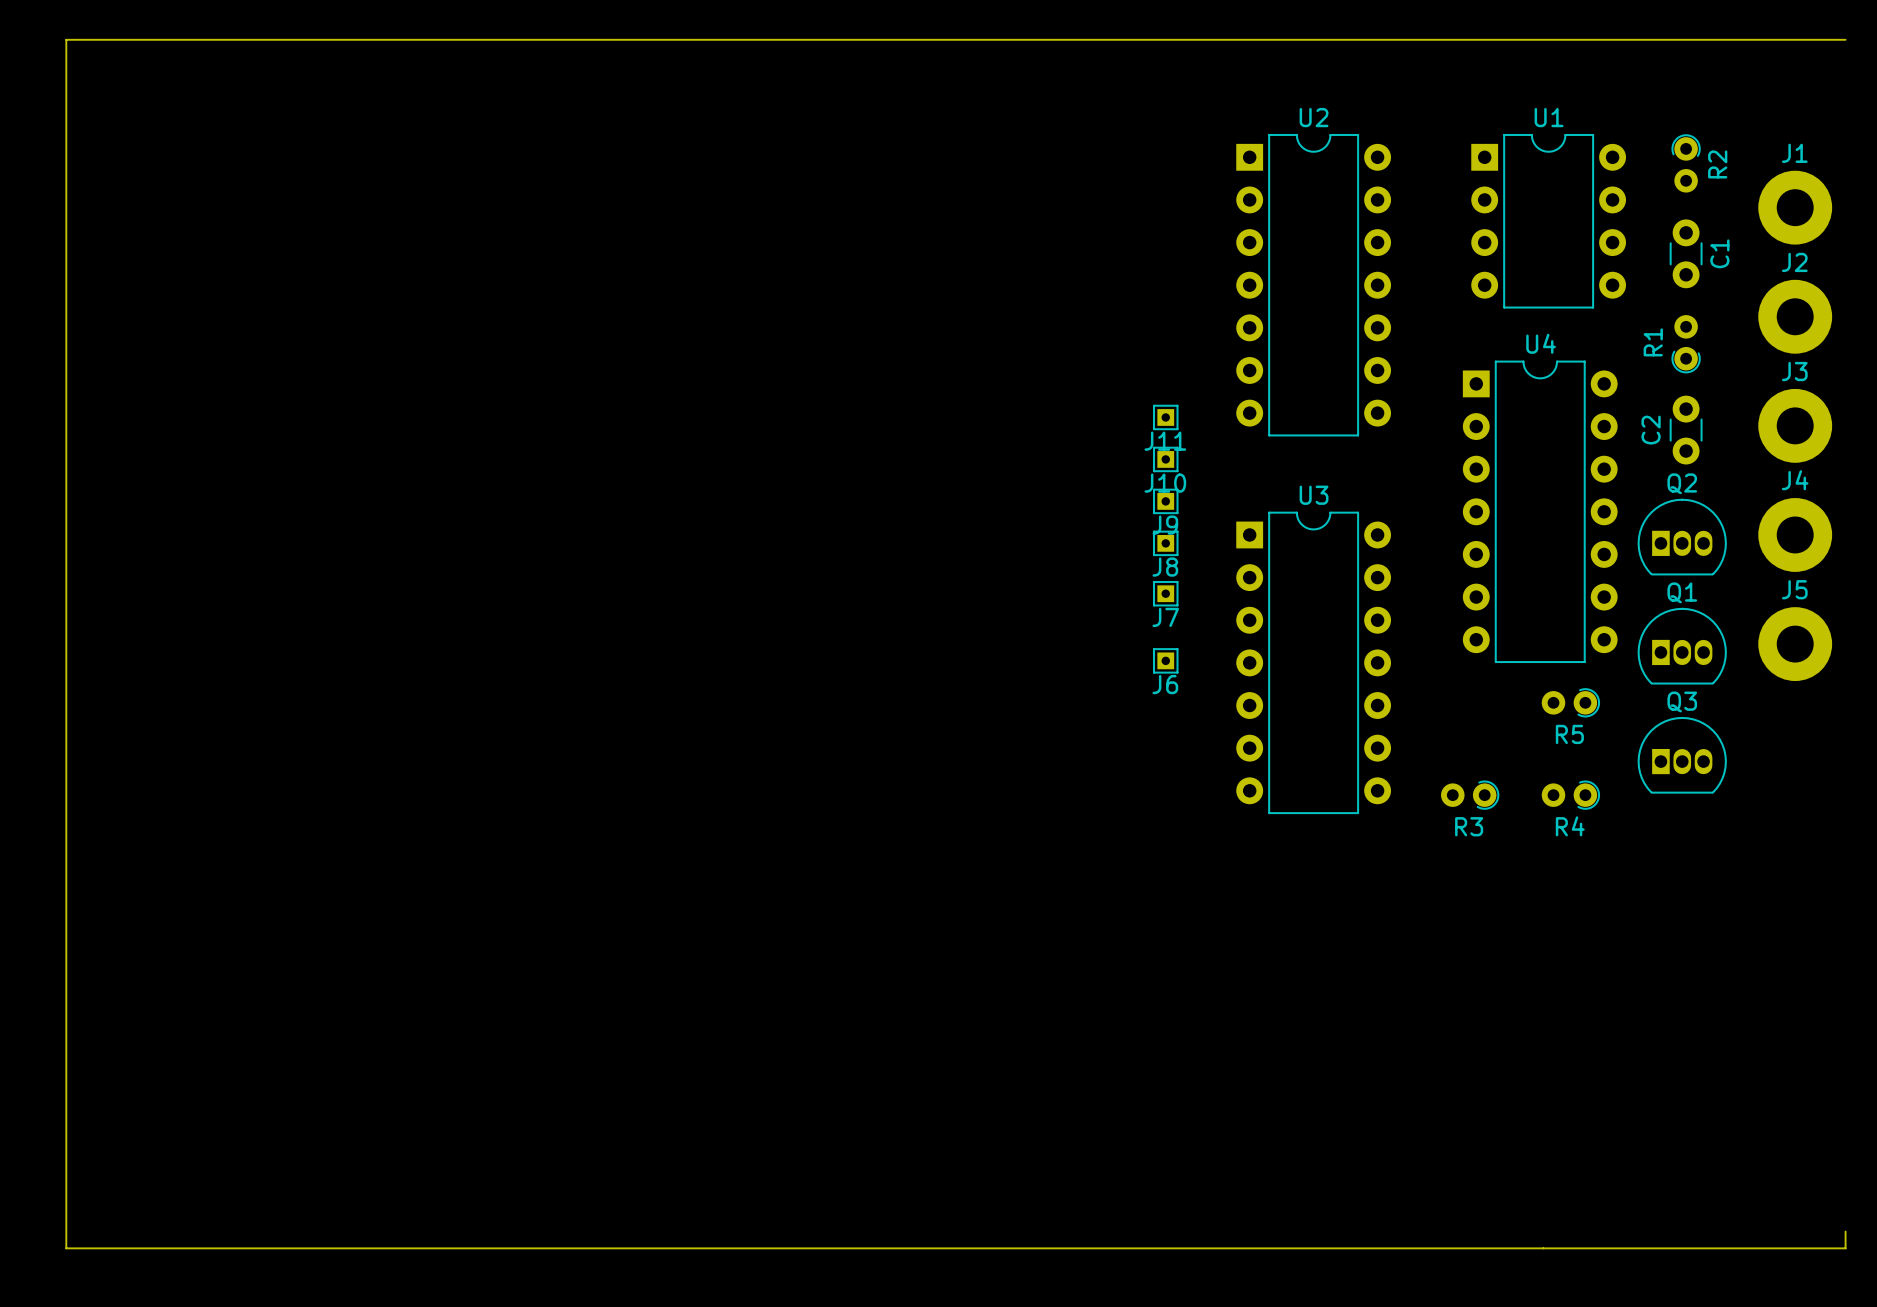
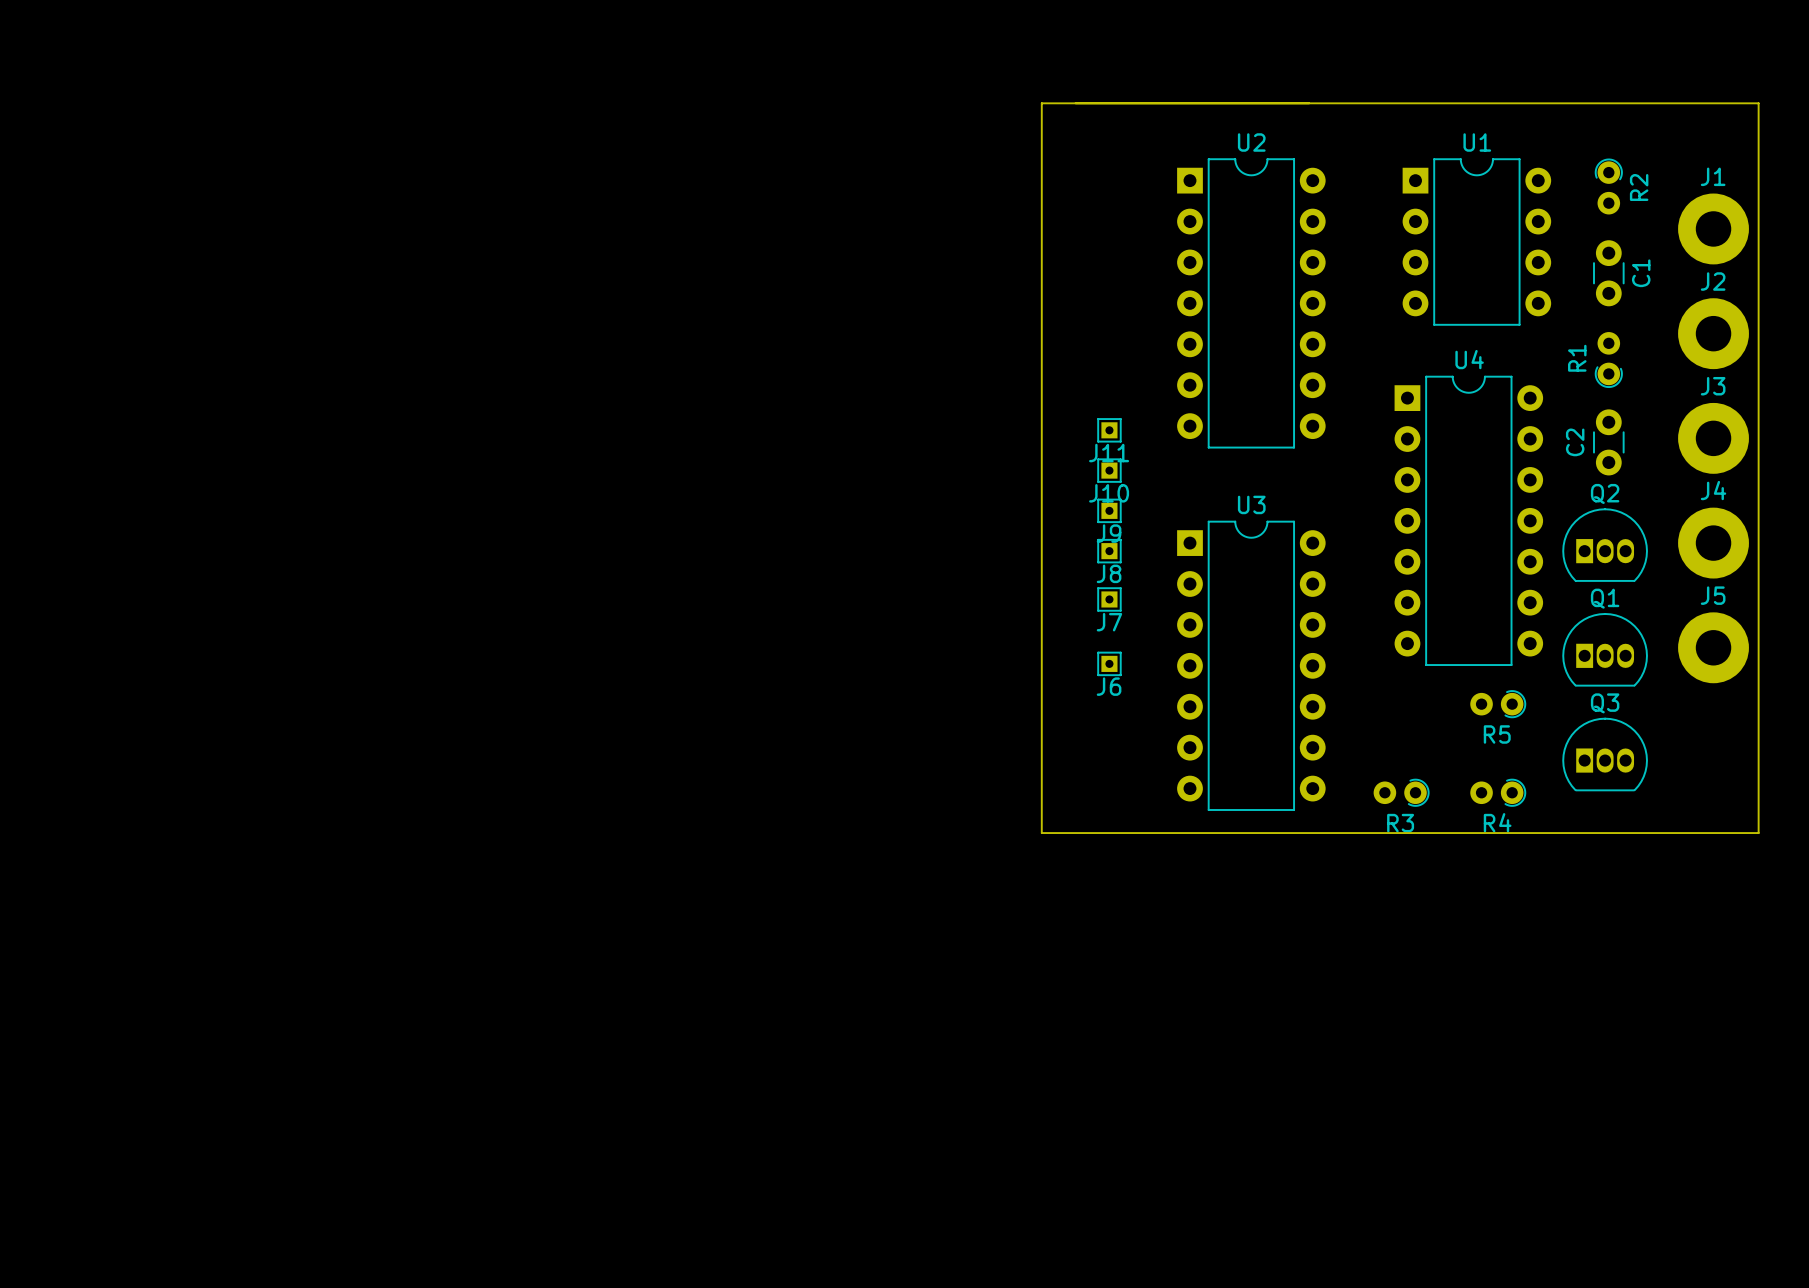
board edge: (1845, 39) (66, 39) (66, 1248) (1845, 1248) (1845, 1231) -> none
board edge: none -> (1041, 103) (1758, 103) (1758, 833) (1041, 833) (1041, 103)

